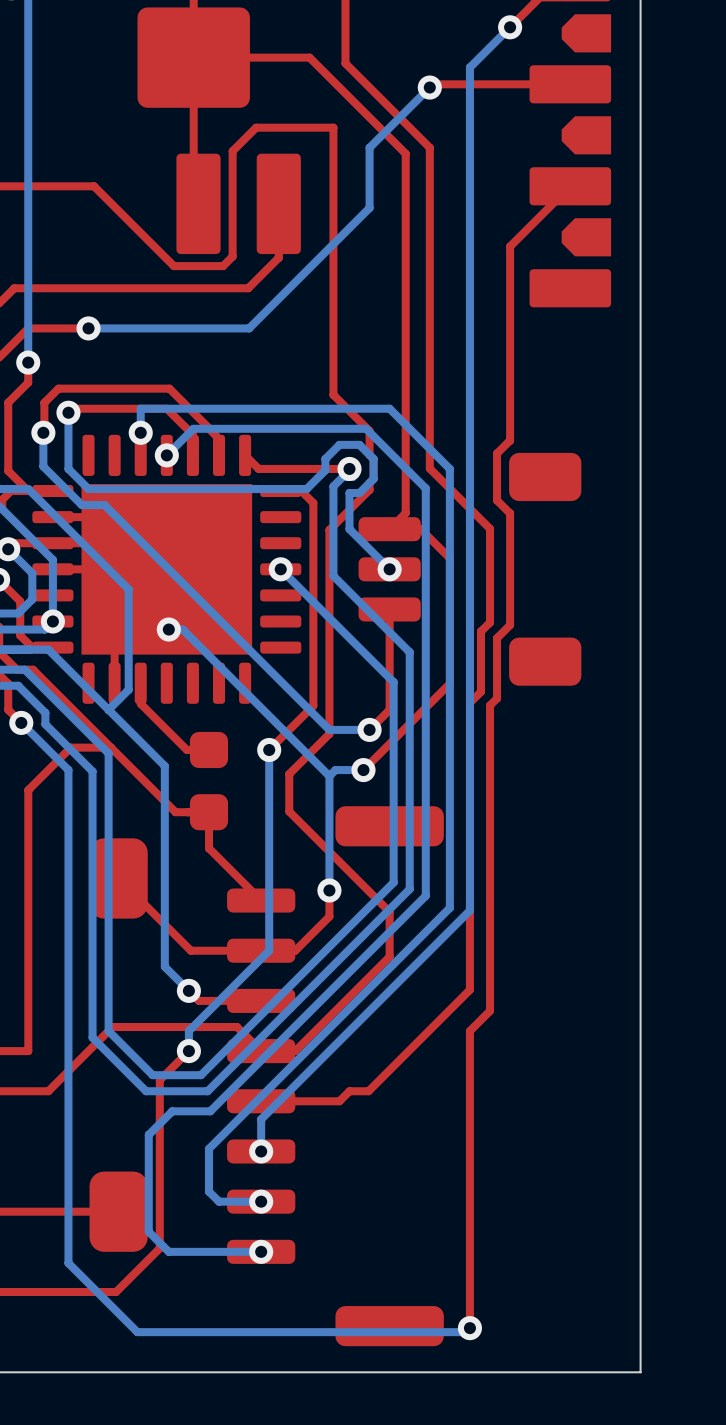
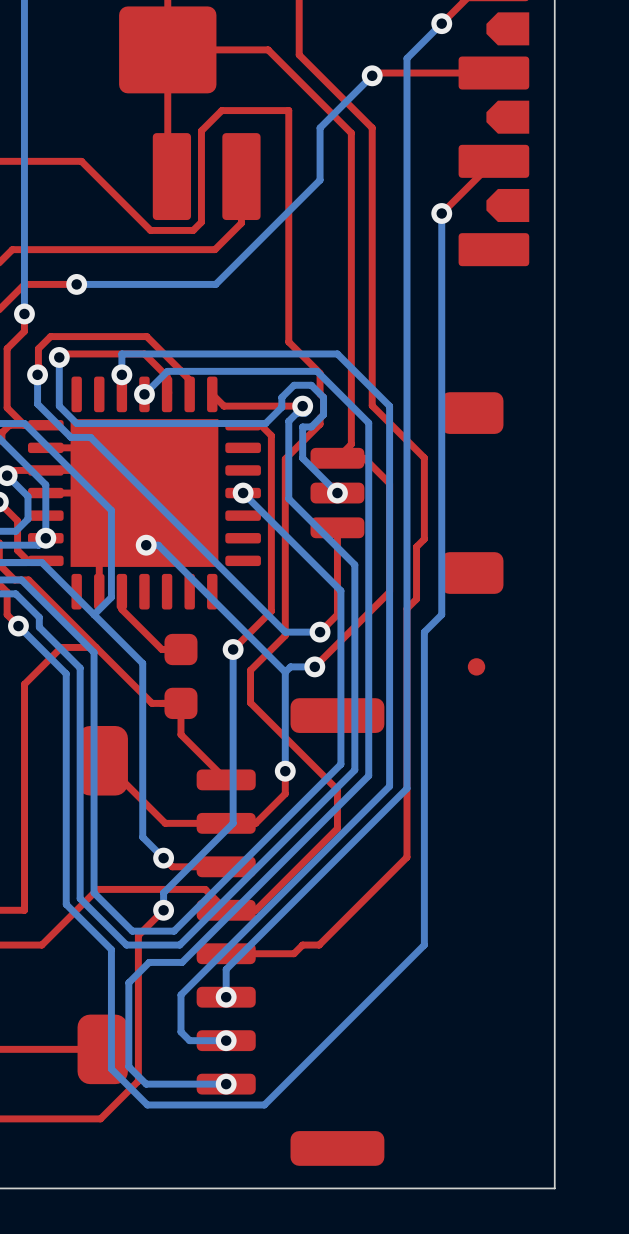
top track: (510, 246) (510, 440) -> none
via: none -> (441, 213)
top track: (509, 440) (497, 453) (497, 500) (509, 513) -> none
top track: (510, 513) (510, 625) (497, 638) (497, 698) (490, 705) (490, 1010) (469, 1031) (469, 1328) -> none
bottom track: (68, 770) (68, 1263) (137, 1332) (465, 1332) (469, 1328) -> (59, 666) (66, 673) (66, 904) (111, 949) (111, 1069) (147, 1104) (264, 1104) (424, 945) (424, 632) (441, 614) (441, 213)
part: none -> (476, 666)
via: (469, 1328) -> none

